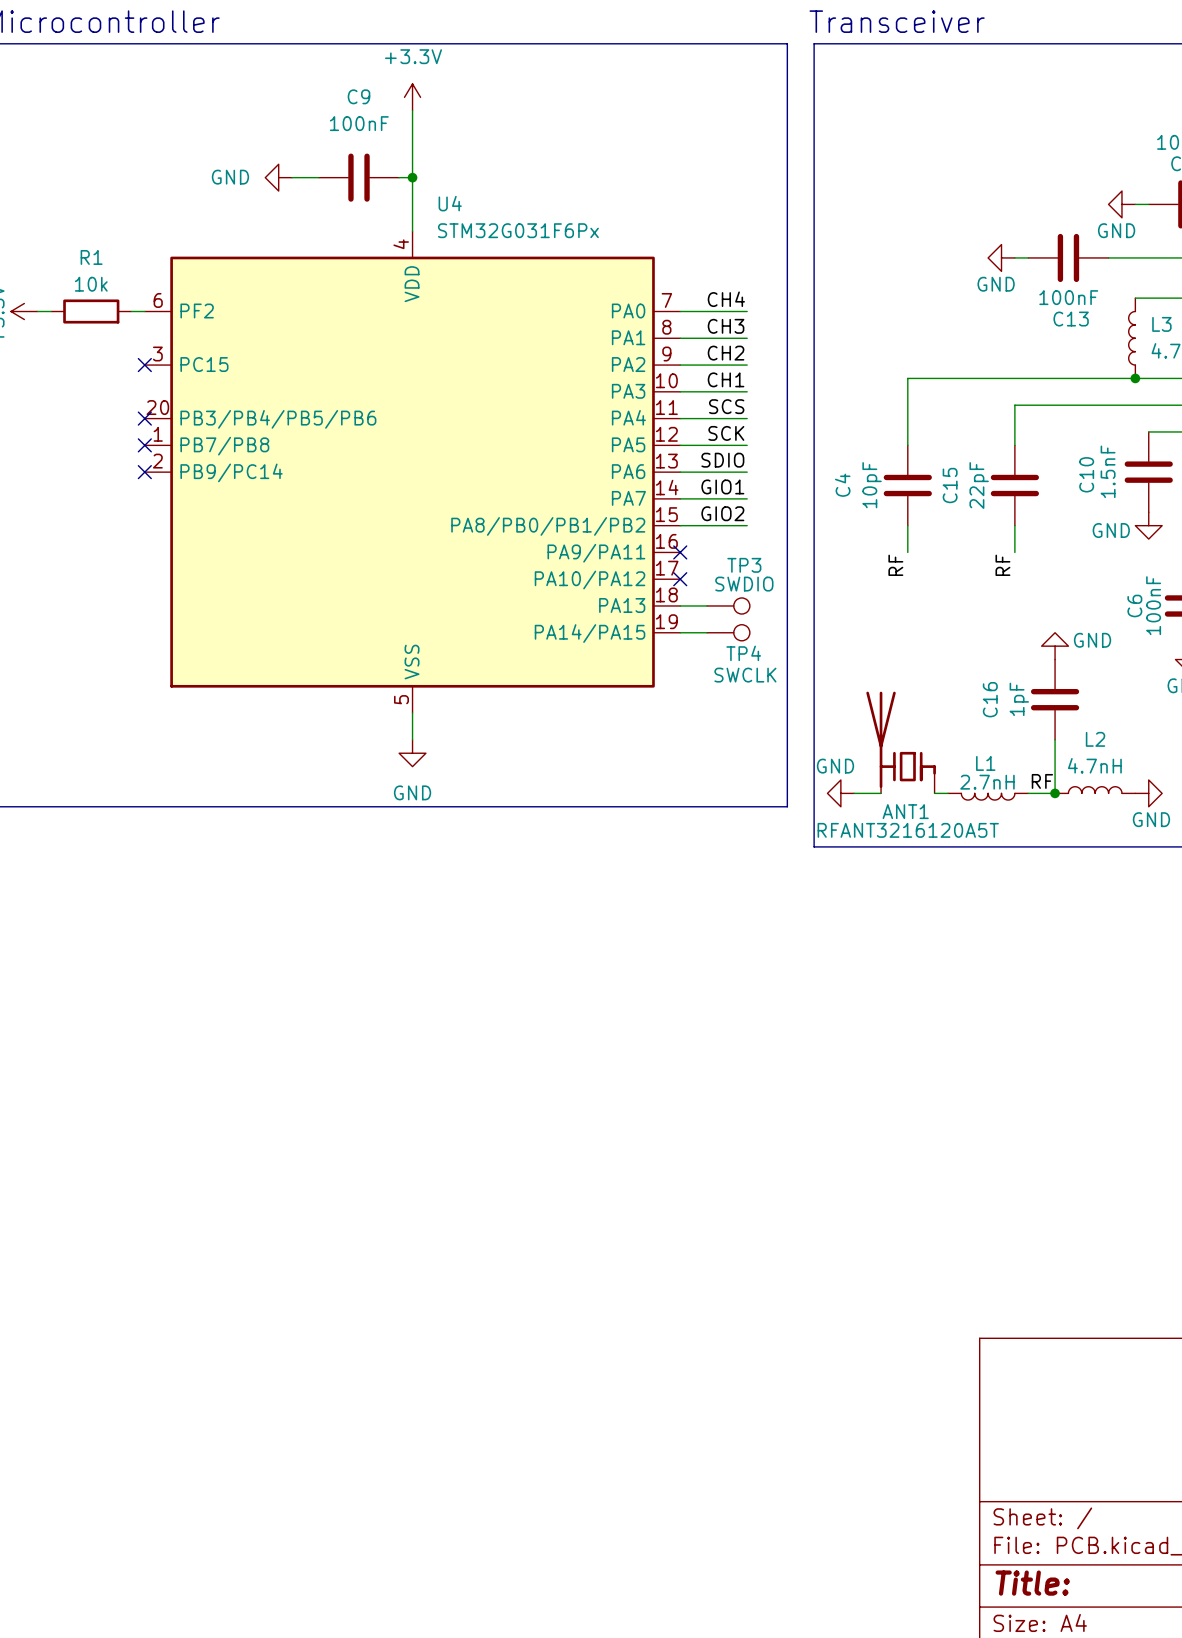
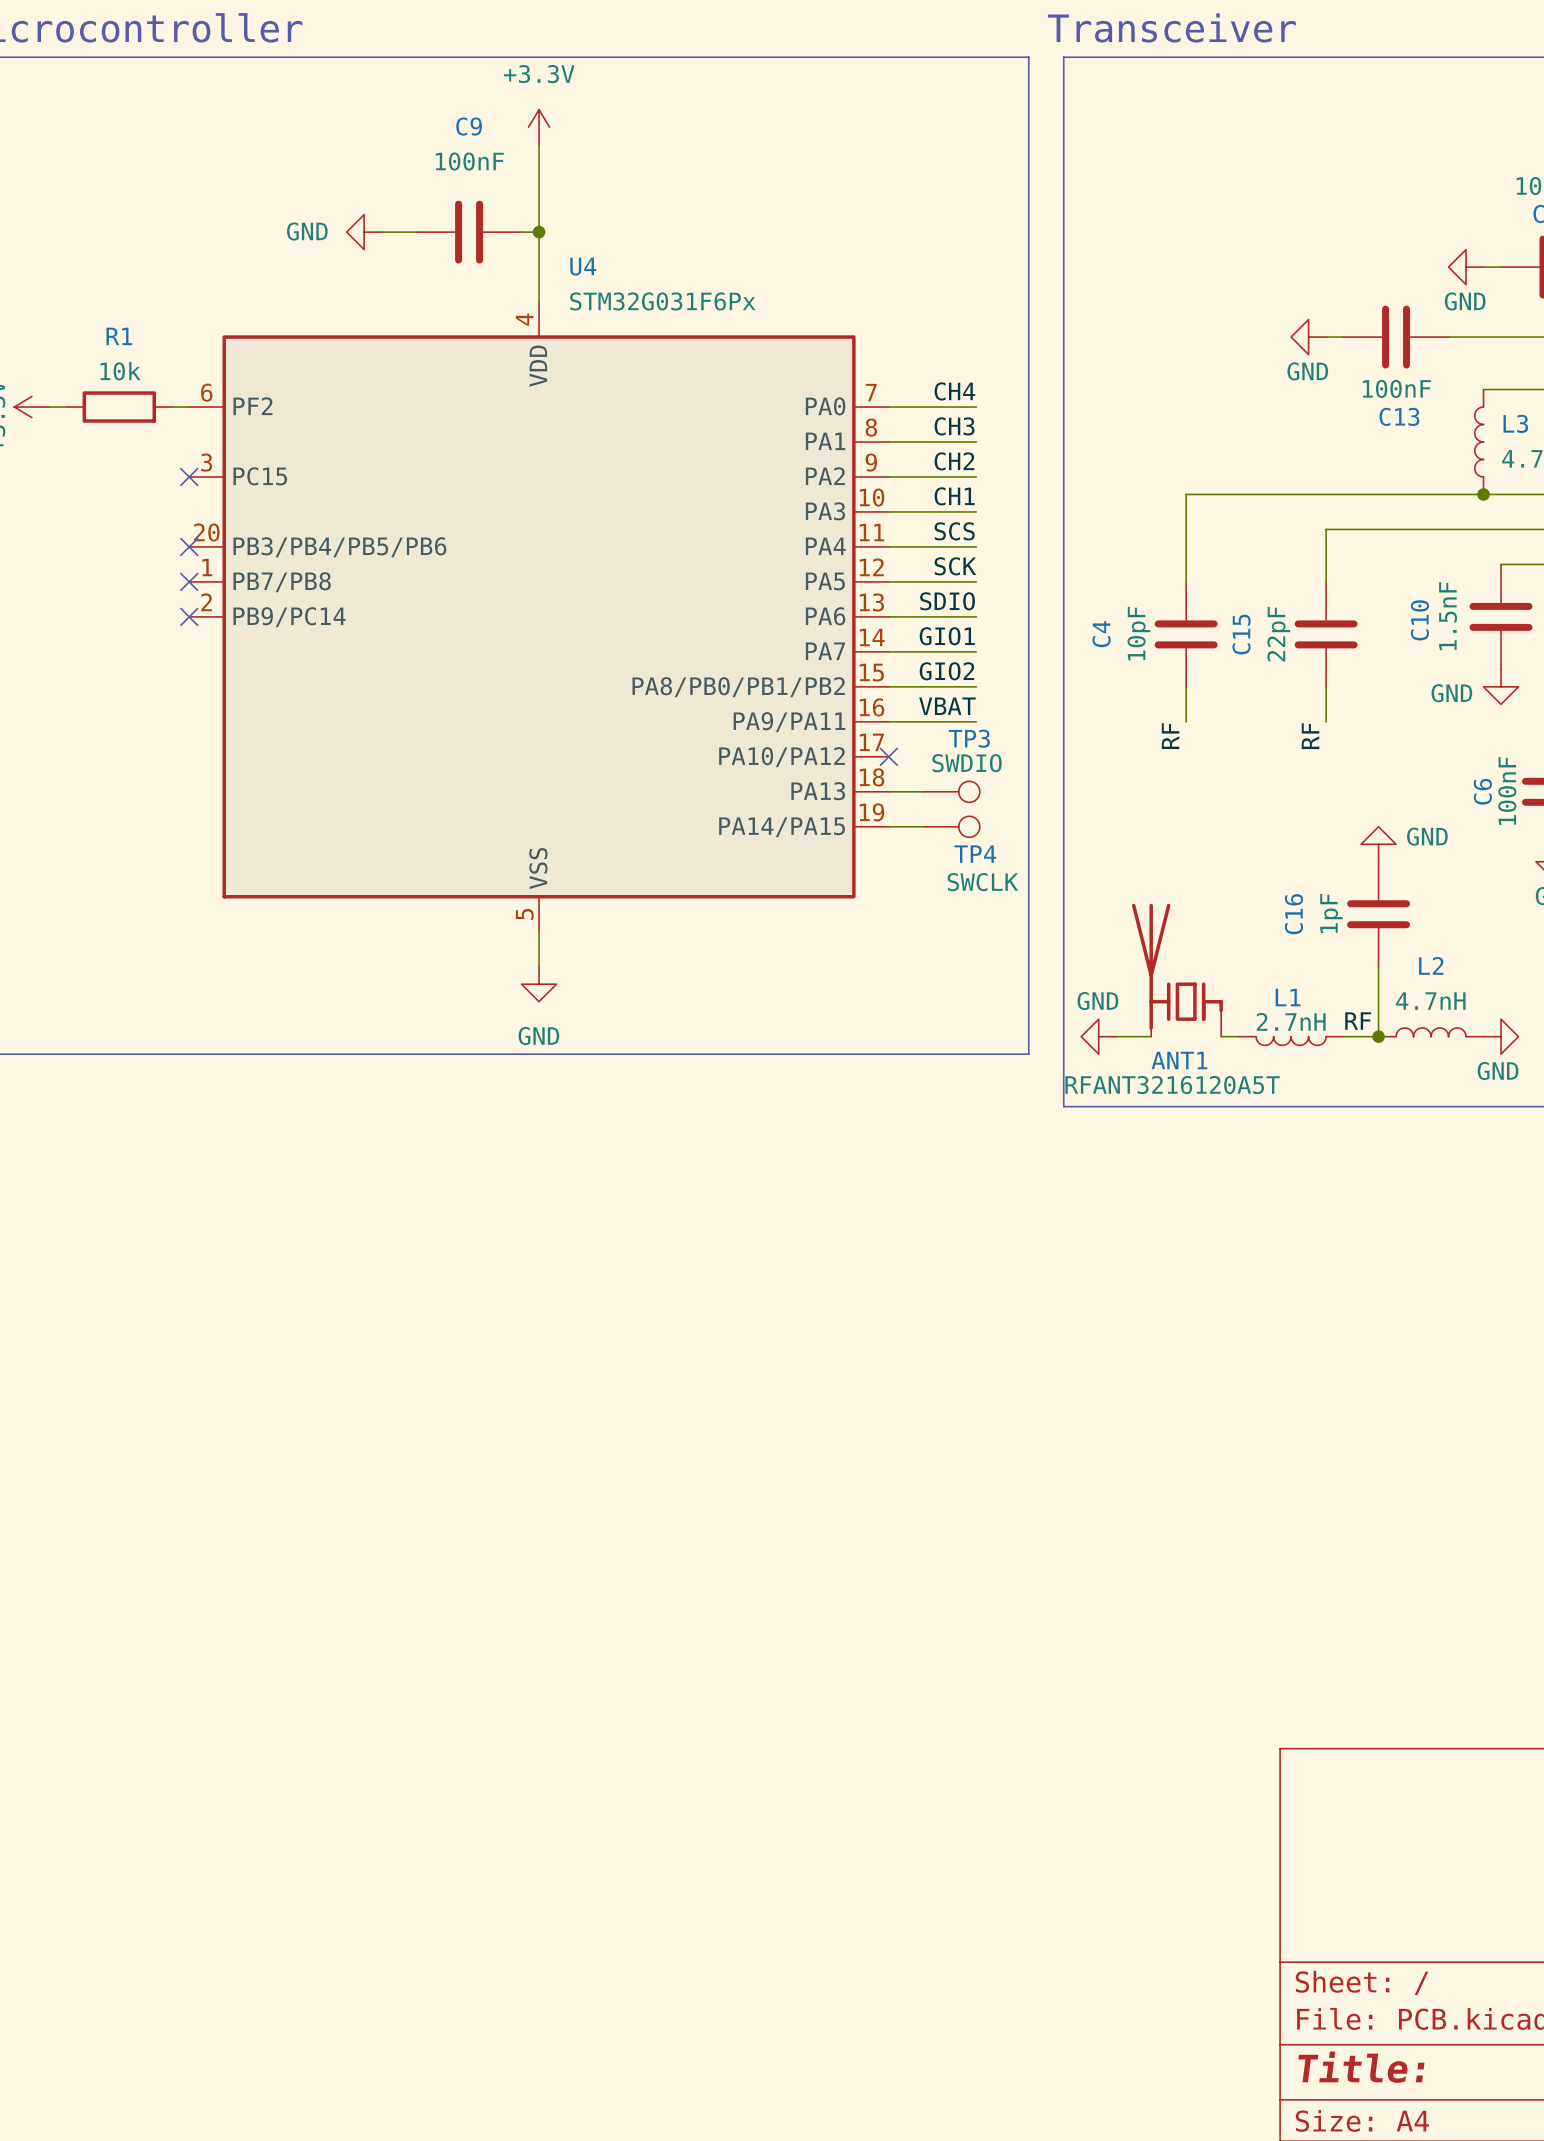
label: none -> VBAT (947, 706)
wire: none -> (888, 721) (976, 721)
no-connect mark: (680, 552) -> none

